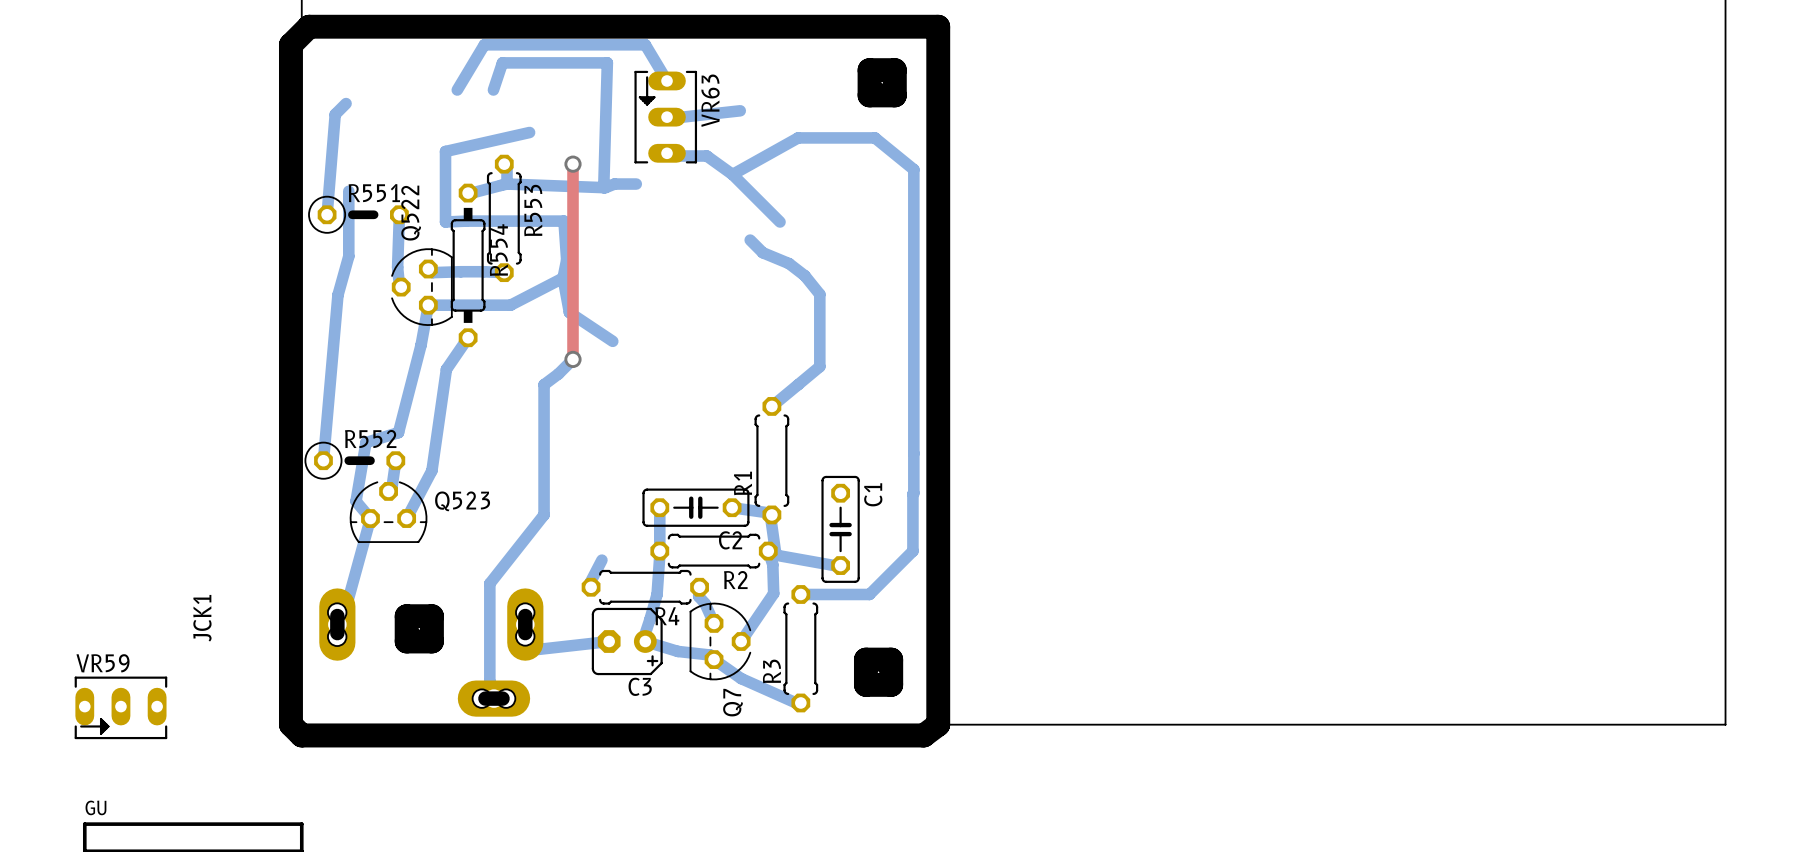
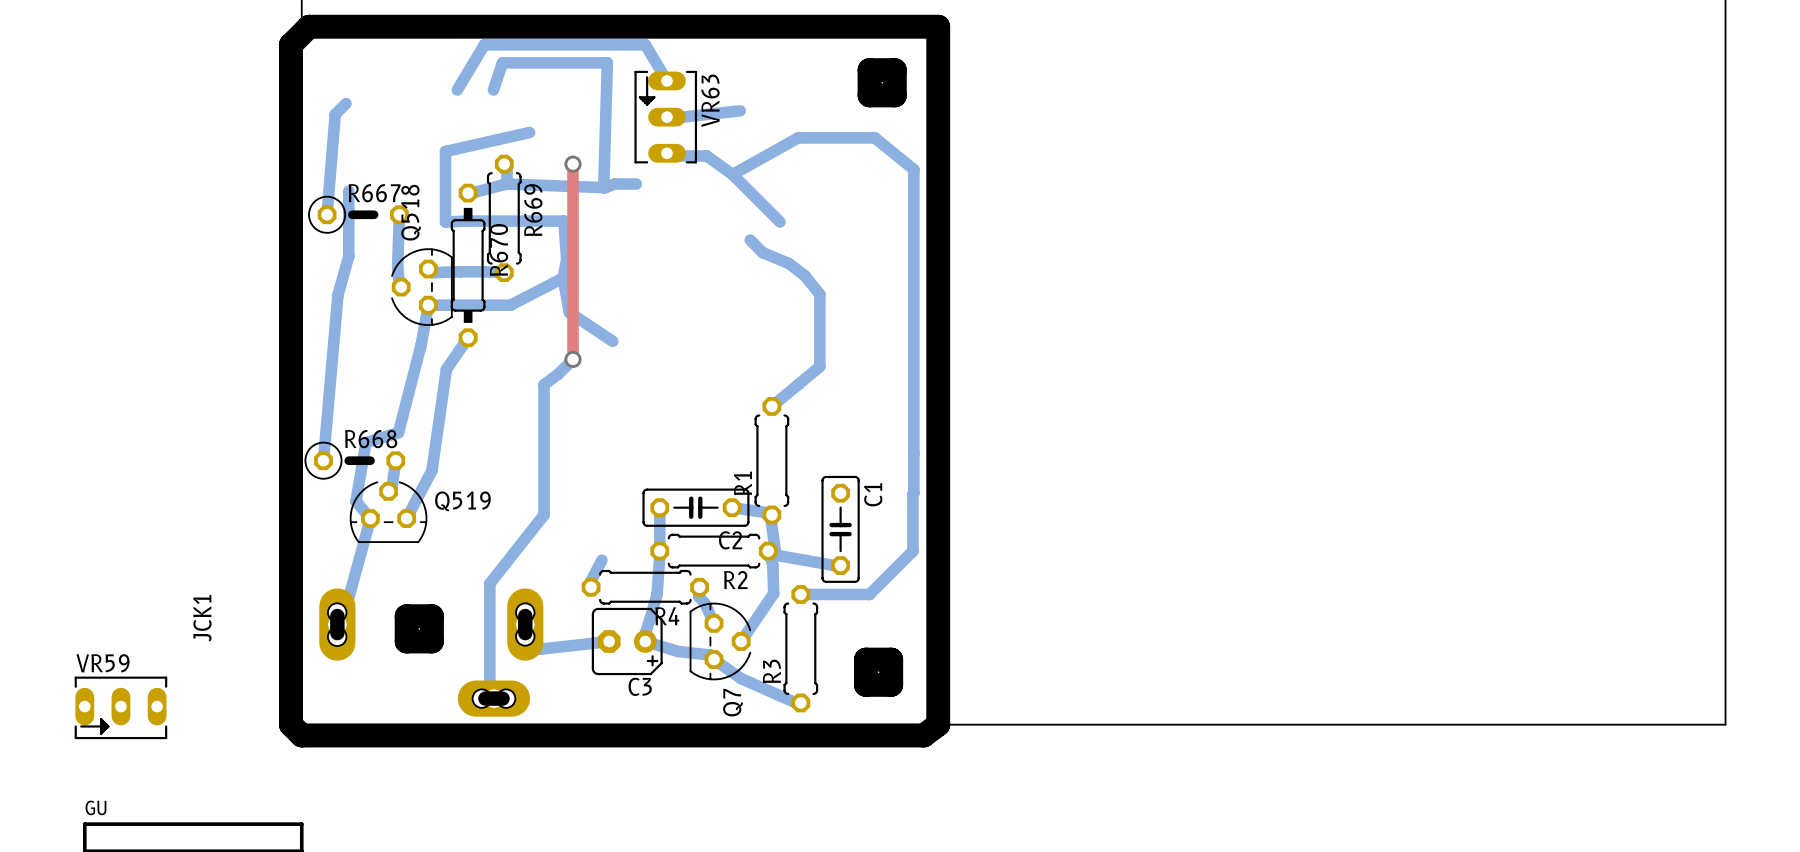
R551 name: R551 (374, 193) -> R667 (374, 193)
R553 name: R553 (533, 210) -> R669 (533, 210)
Q522 name: Q522 (411, 213) -> Q518 (411, 212)
R554 name: R554 (498, 250) -> R670 (498, 250)
R552 name: R552 (370, 439) -> R668 (371, 439)
Q523 name: Q523 (462, 501) -> Q519 (462, 501)

